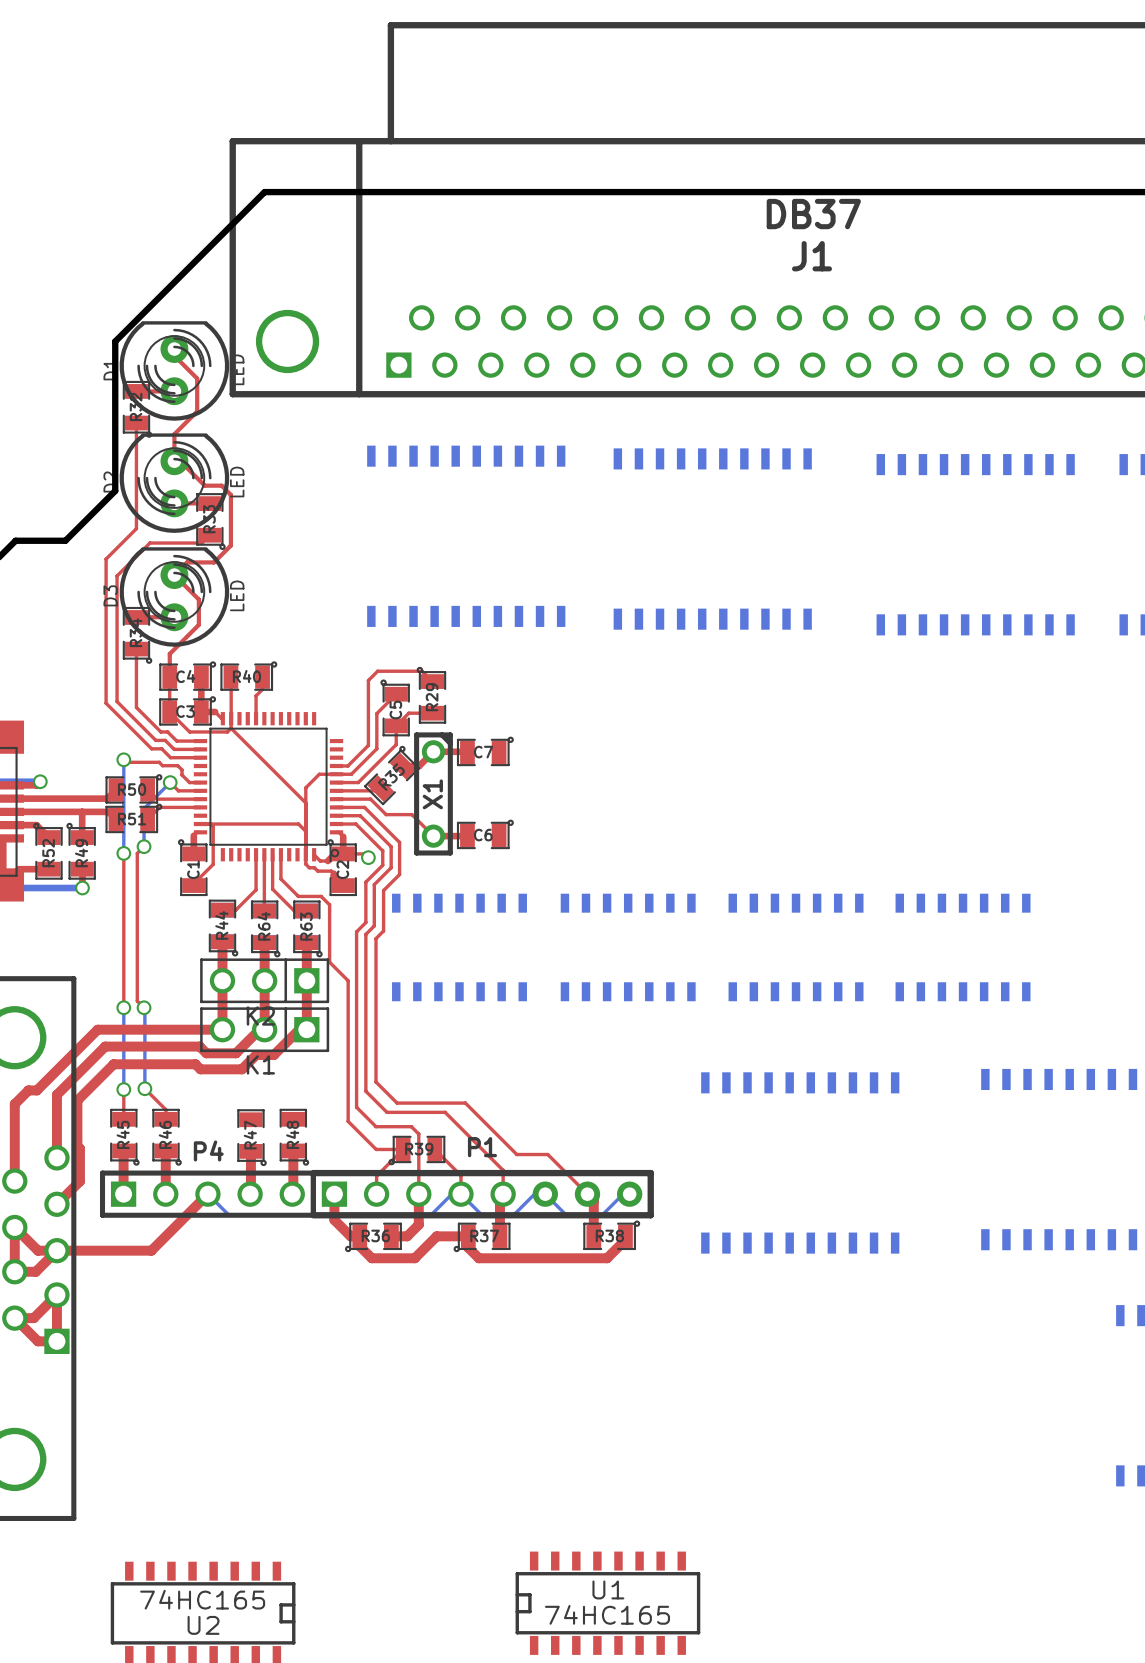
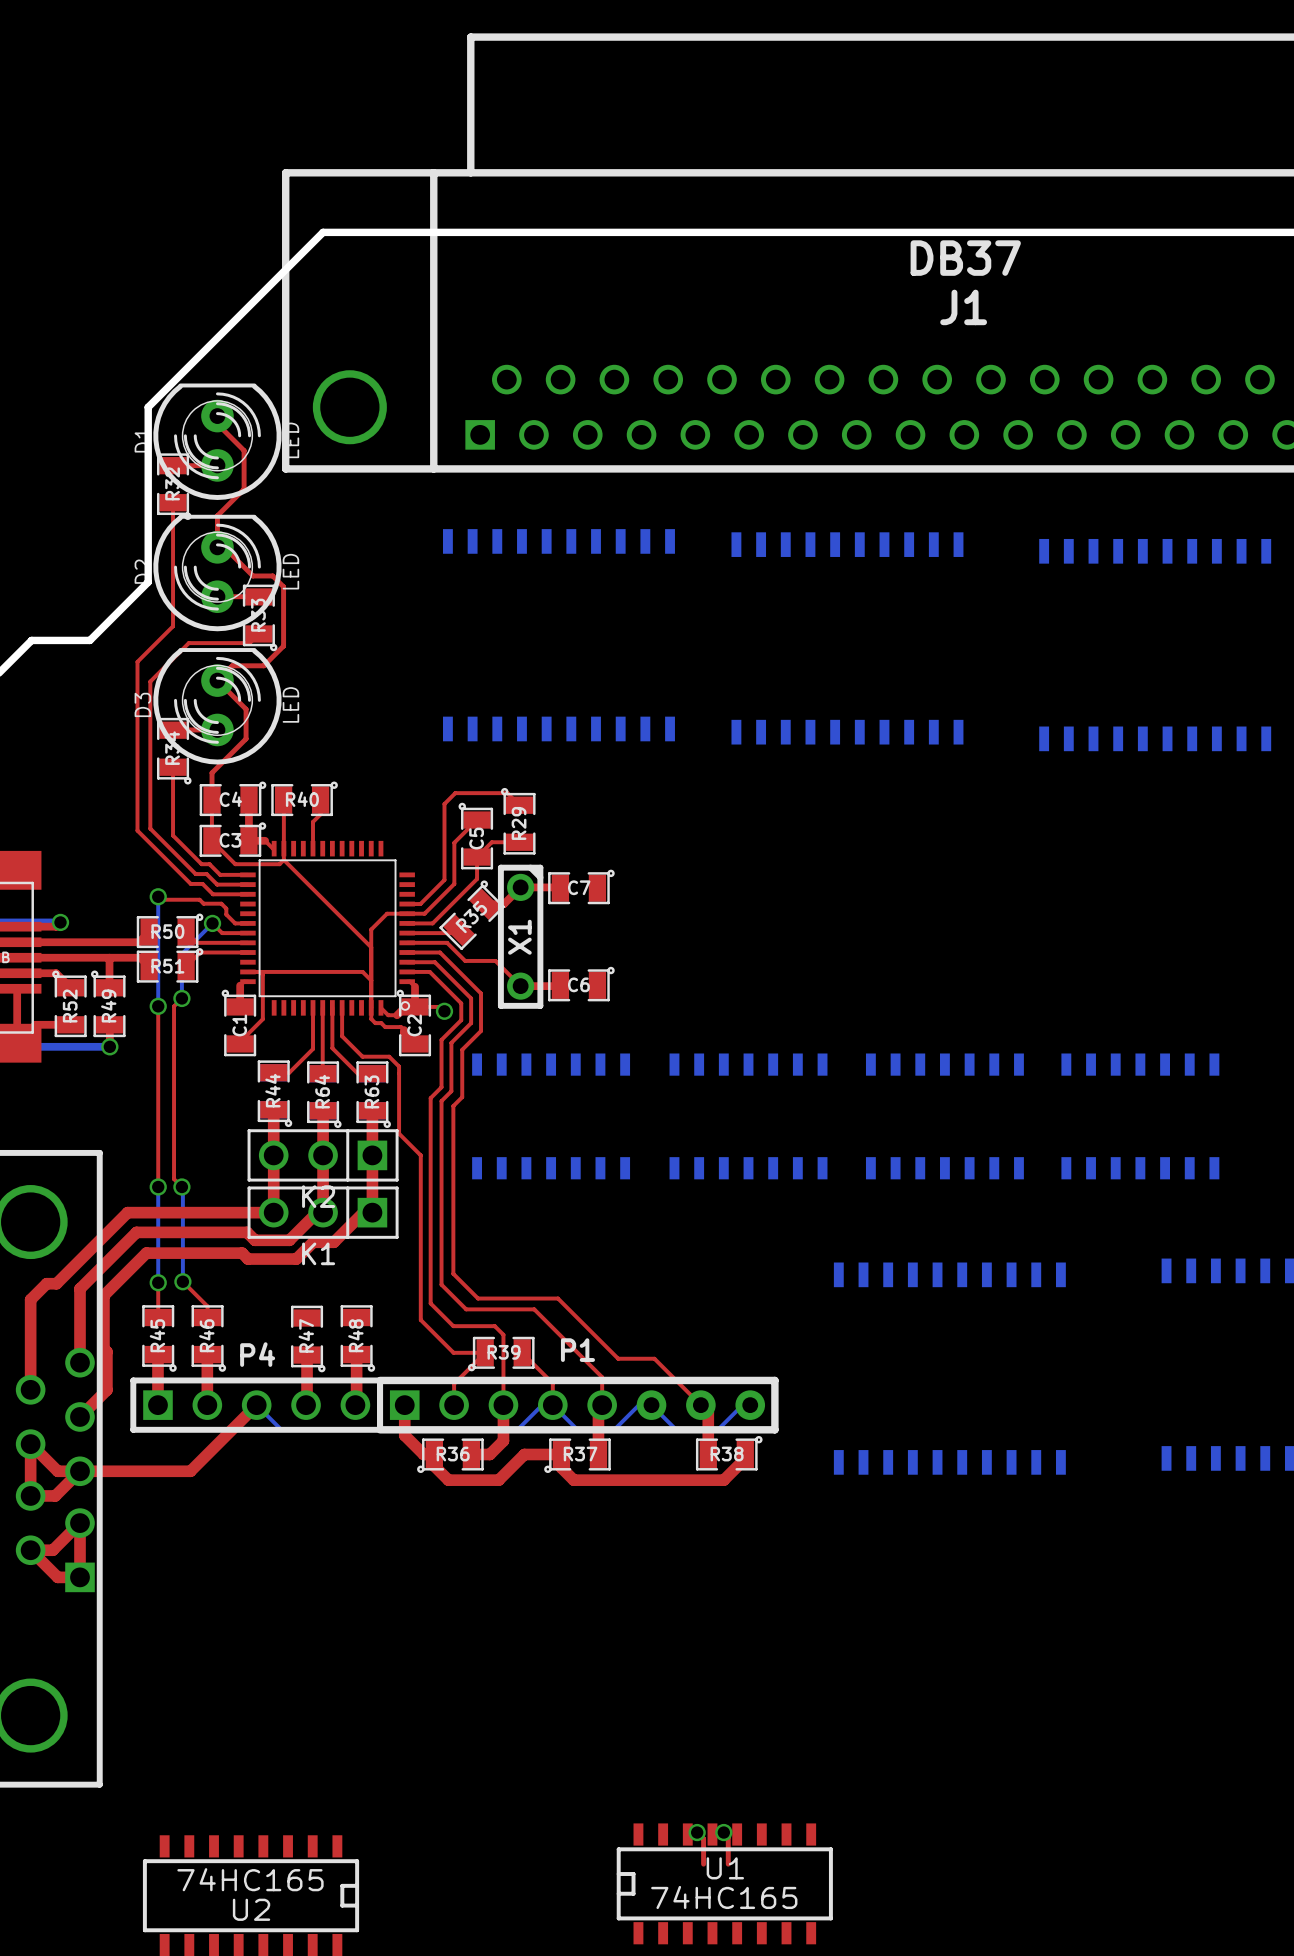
top track: none -> (697, 1832) (703, 1838) (703, 1864)
via: none -> (697, 1832)
top track: none -> (723, 1832) (728, 1836) (728, 1864)
via: none -> (723, 1832)

